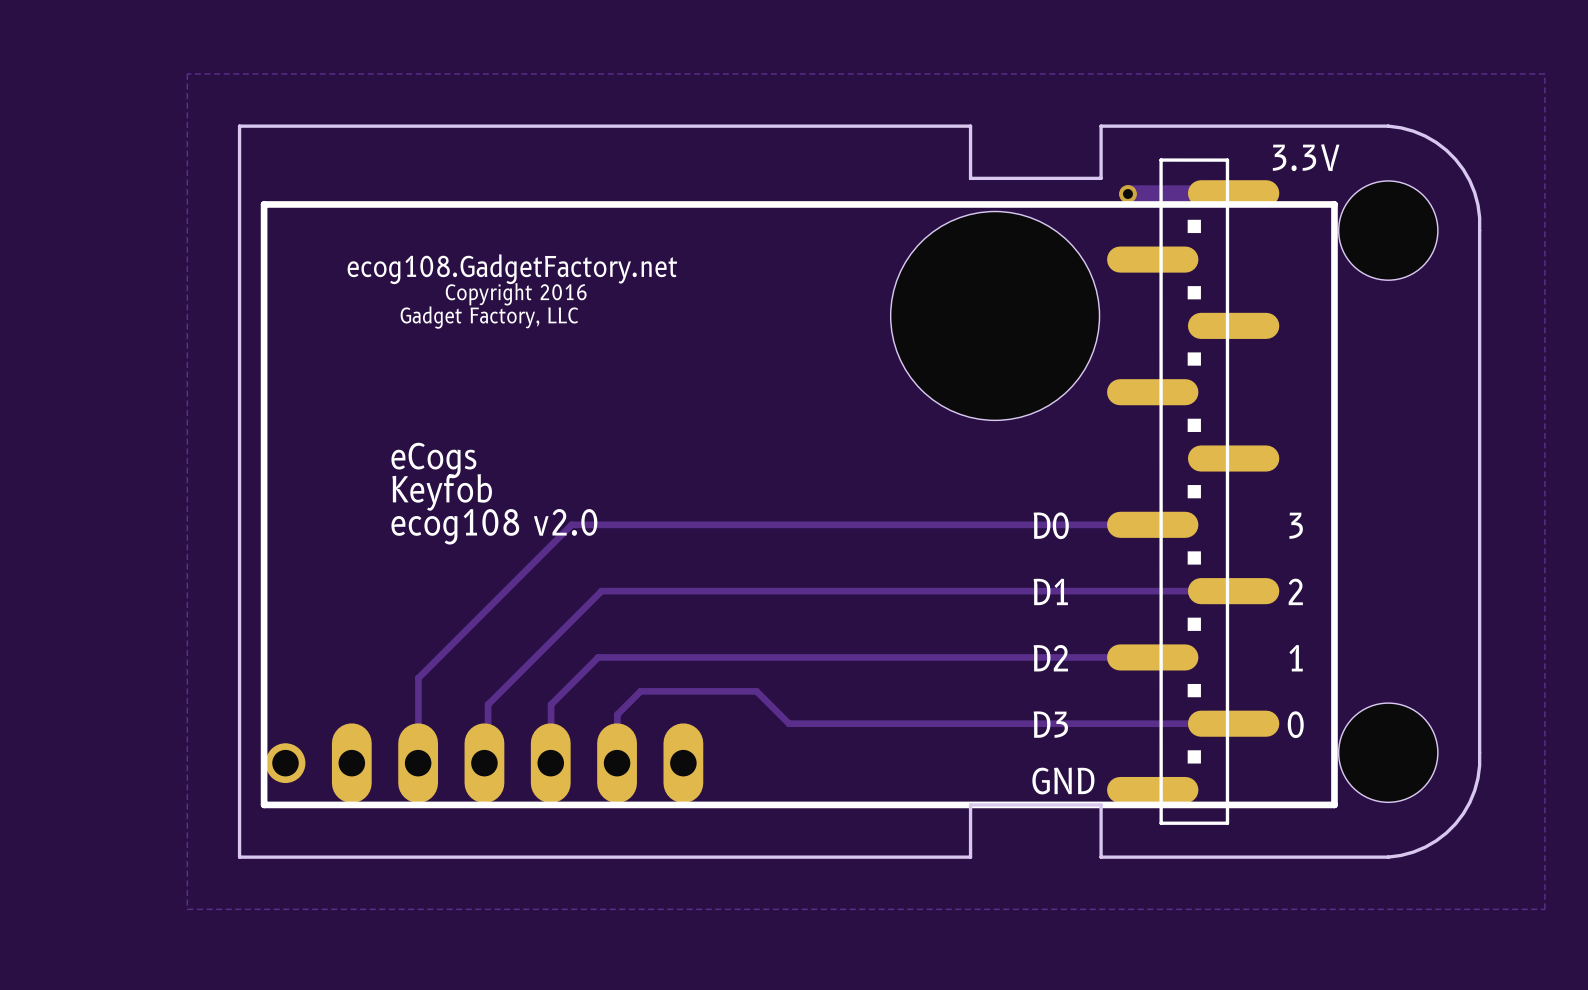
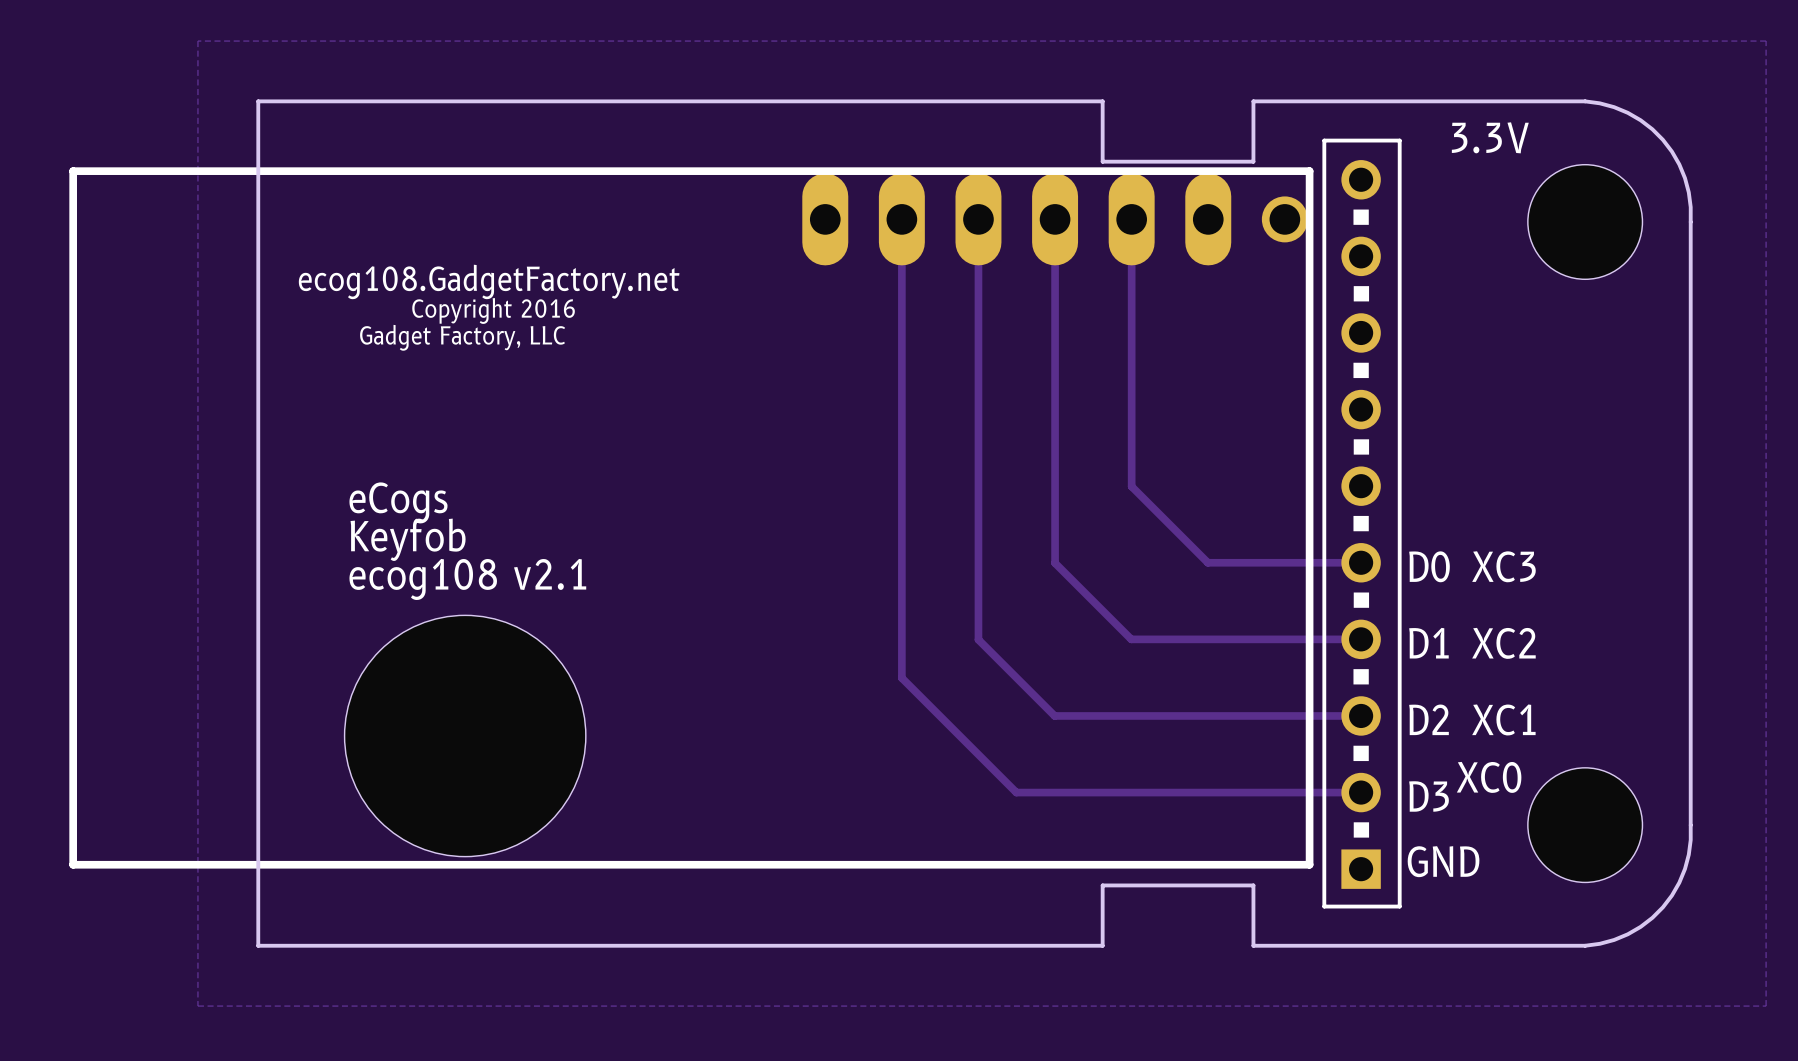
part footprint: [237, 124, 1482, 859] -> [256, 99, 1693, 948]
track: (1233, 193) (1127, 194) -> none
via: (1127, 194) -> none
line: (1334, 204) (264, 204) (264, 804) (1334, 804) (1334, 204) -> (1309, 171) (73, 171) (73, 864) (1309, 864) (1309, 171)
track: none -> (901, 219) (901, 678) (1016, 792) (1361, 792)
track: none -> (978, 219) (978, 639) (1054, 715) (1361, 715)
track: none -> (1055, 219) (1055, 563) (1131, 639) (1361, 639)
part: none -> (1055, 219)
track: none -> (1131, 219) (1131, 486) (1207, 562) (1361, 562)
text position: ecog108.GadgetFactory.net (512, 269) -> ecog108.GadgetFactory.net (489, 281)
text position: Copyright 2016 (516, 294) -> Copyright 2016 (493, 310)
hole: (995, 315) -> none
text position: Gadget Factory, LLC (489, 317) -> Gadget Factory, LLC (462, 337)
text position: eCogs (433, 460) -> eCogs (398, 502)
text position: Keyfob (442, 492) -> Keyfob (408, 539)
track: (1152, 524) (571, 524) (418, 678) (418, 762) -> none
text position: D0 (1051, 525) -> D0 (1429, 566)
text: 3 (1296, 525) -> XC3 (1503, 566)
text: ecog108 v2.0 (494, 526) -> ecog108 v2.1 (467, 579)
text position: D1 (1050, 591) -> D1 (1428, 643)
track: (1233, 591) (601, 591) (488, 704) (488, 759) (484, 763) -> none
text: 2 (1295, 591) -> XC2 (1503, 643)
track: (1152, 657) (598, 657) (551, 704) (551, 762) -> none
text position: D2 (1050, 658) -> D2 (1429, 719)
text: 1 (1296, 658) -> XC1 (1503, 719)
hole: none -> (465, 735)
track: (1233, 723) (788, 723) (756, 691) (640, 691) (617, 714) (617, 762) -> none
text position: D3 (1050, 724) -> D3 (1429, 796)
text: 0 (1295, 724) -> XC0 (1489, 777)
part: (484, 763) -> none
text position: GND (1063, 781) -> GND (1443, 861)

